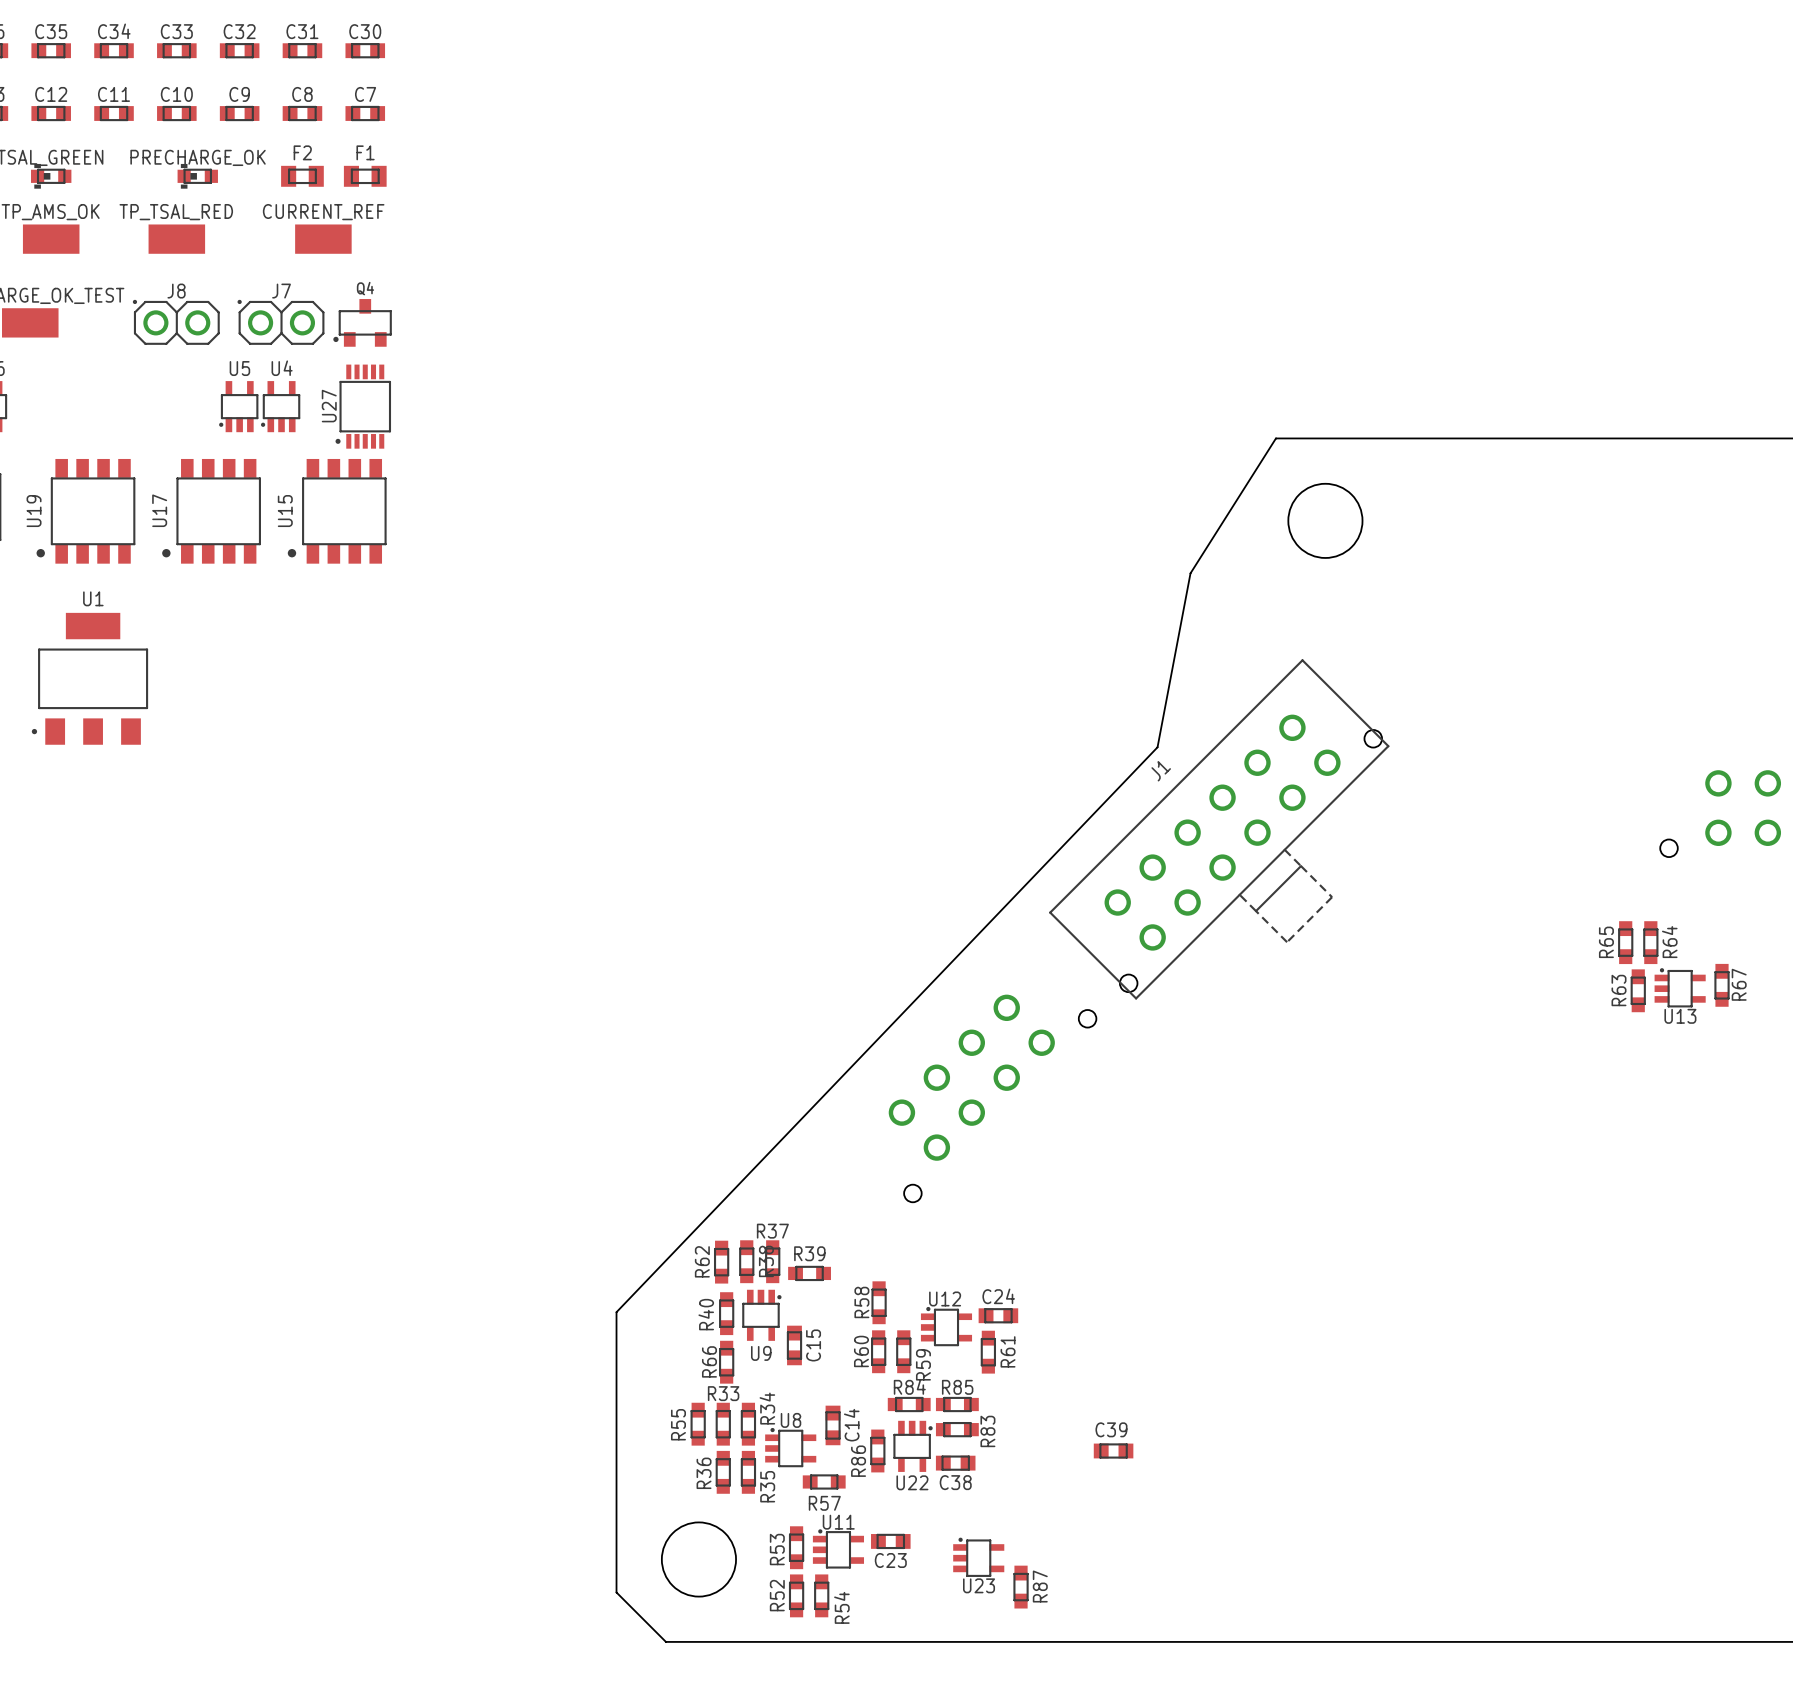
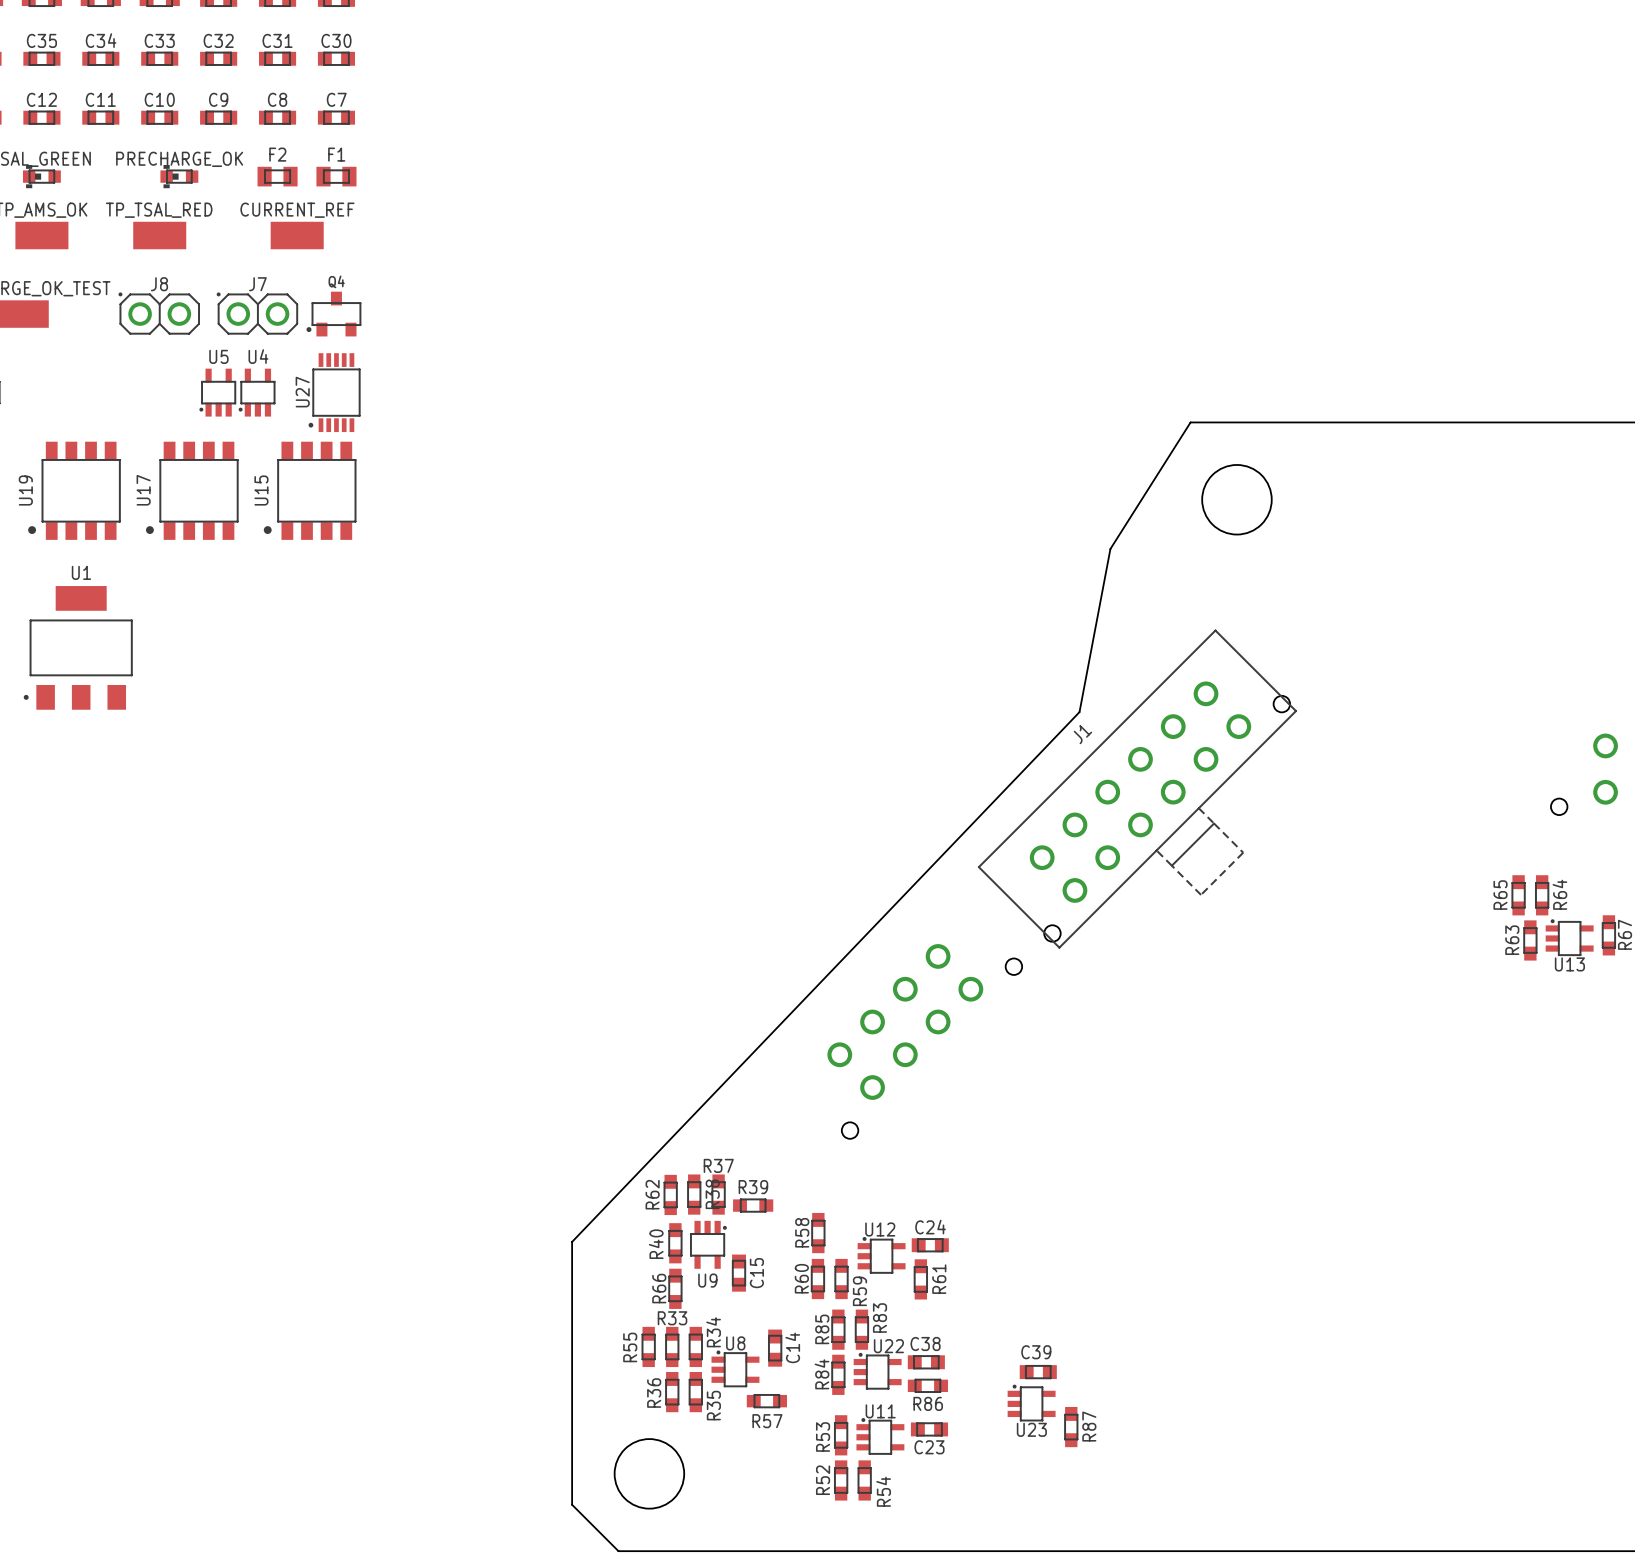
R84 rotation: 0° (909, 1404) -> 90° clockwise (838, 1374)
R84 position: (909, 1404) -> (838, 1374)
R85 rotation: 0° (957, 1404) -> 90° clockwise (838, 1329)
R85 position: (957, 1404) -> (838, 1329)
R83 rotation: 0° (957, 1429) -> 90° clockwise (861, 1329)
R83 position: (957, 1429) -> (861, 1329)
U22 rotation: 0° (913, 1446) -> 90° counterclockwise (877, 1371)
R86 rotation: 0° (877, 1450) -> 90° clockwise (927, 1385)
R86 position: (877, 1450) -> (927, 1385)
C38 position: (955, 1463) -> (926, 1362)
U22 name position: U22 (912, 1482) -> U22 (888, 1346)
C38 name position: C38 (955, 1482) -> C38 (925, 1343)
C23 position: (890, 1541) -> (929, 1429)
R53 position: (796, 1547) -> (841, 1435)
U11 position: (838, 1548) -> (880, 1436)
U23 position: (978, 1557) -> (1031, 1403)
R87 position: (1021, 1587) -> (1071, 1427)
R52 position: (796, 1595) -> (841, 1480)
R54 position: (821, 1595) -> (864, 1480)

